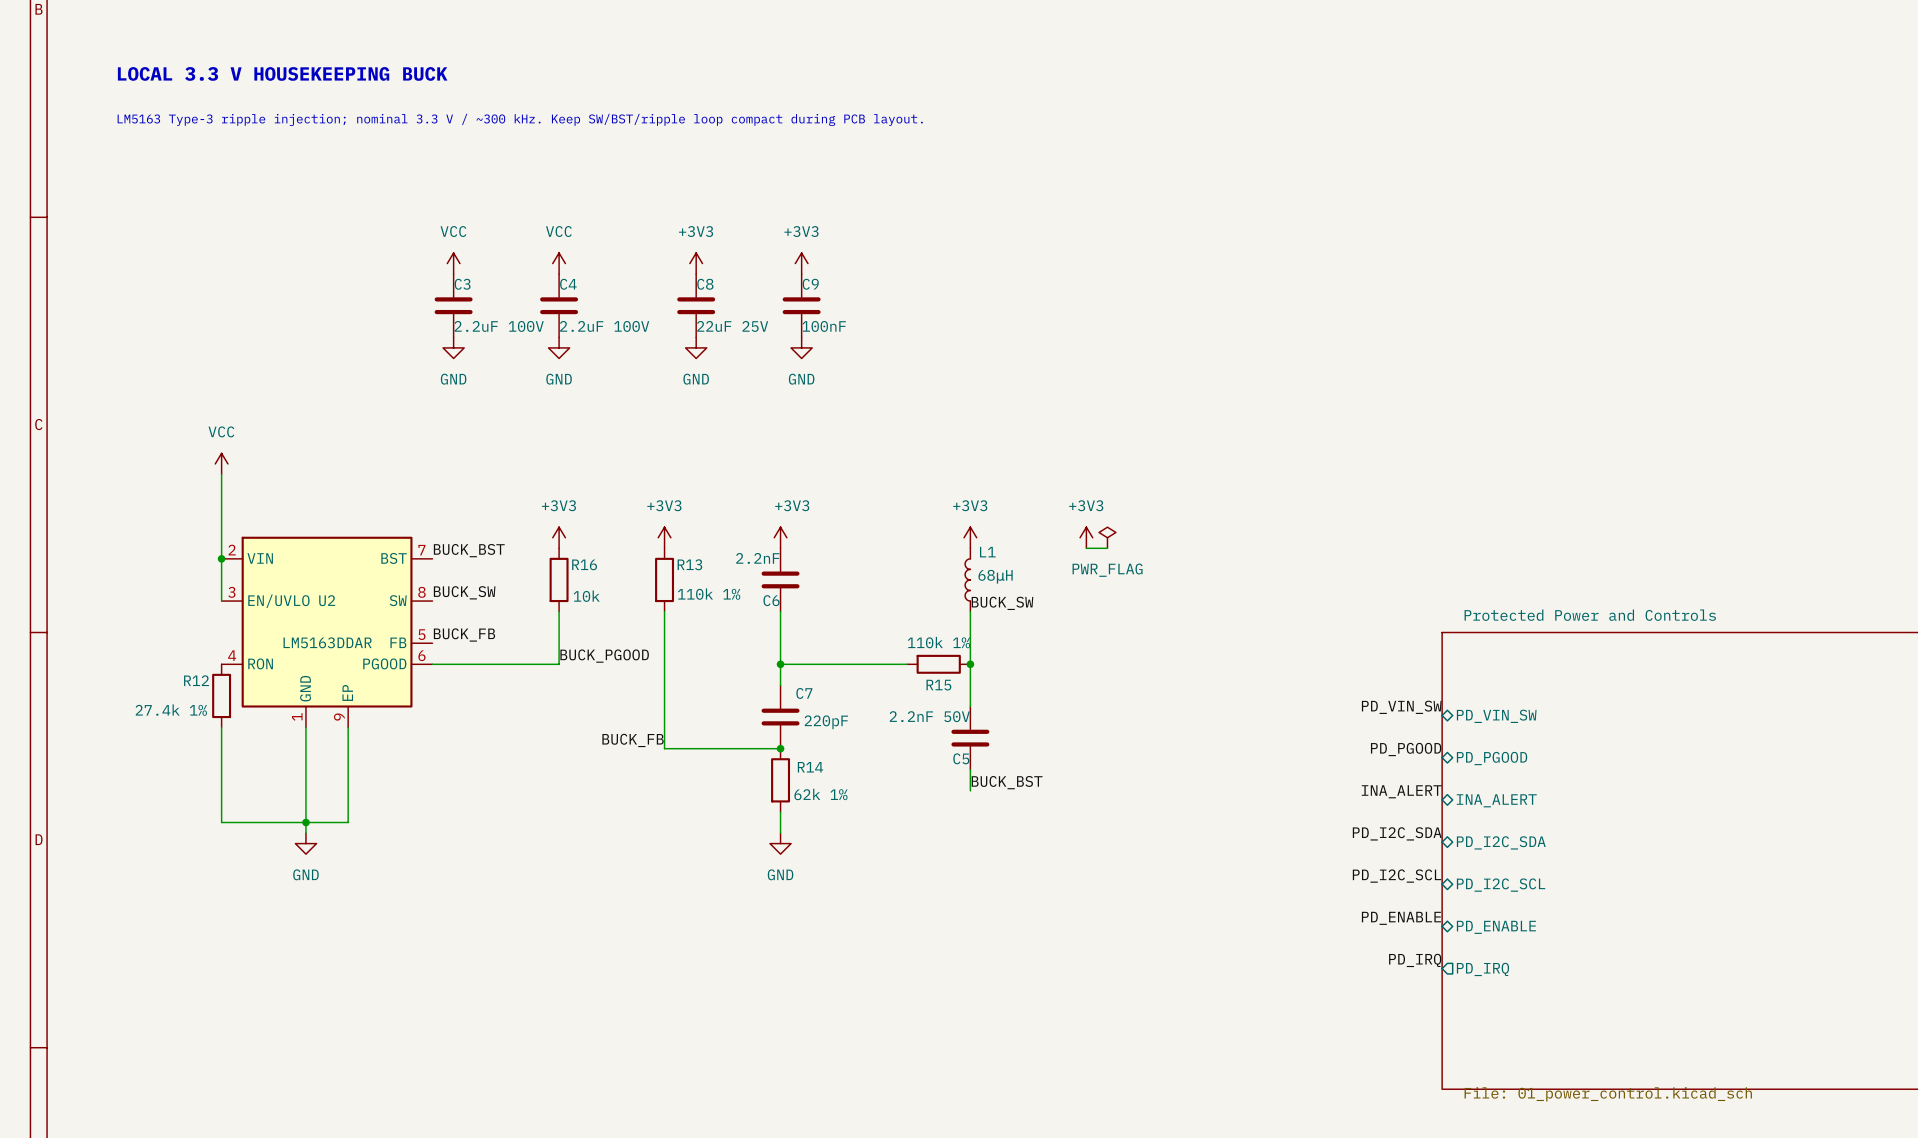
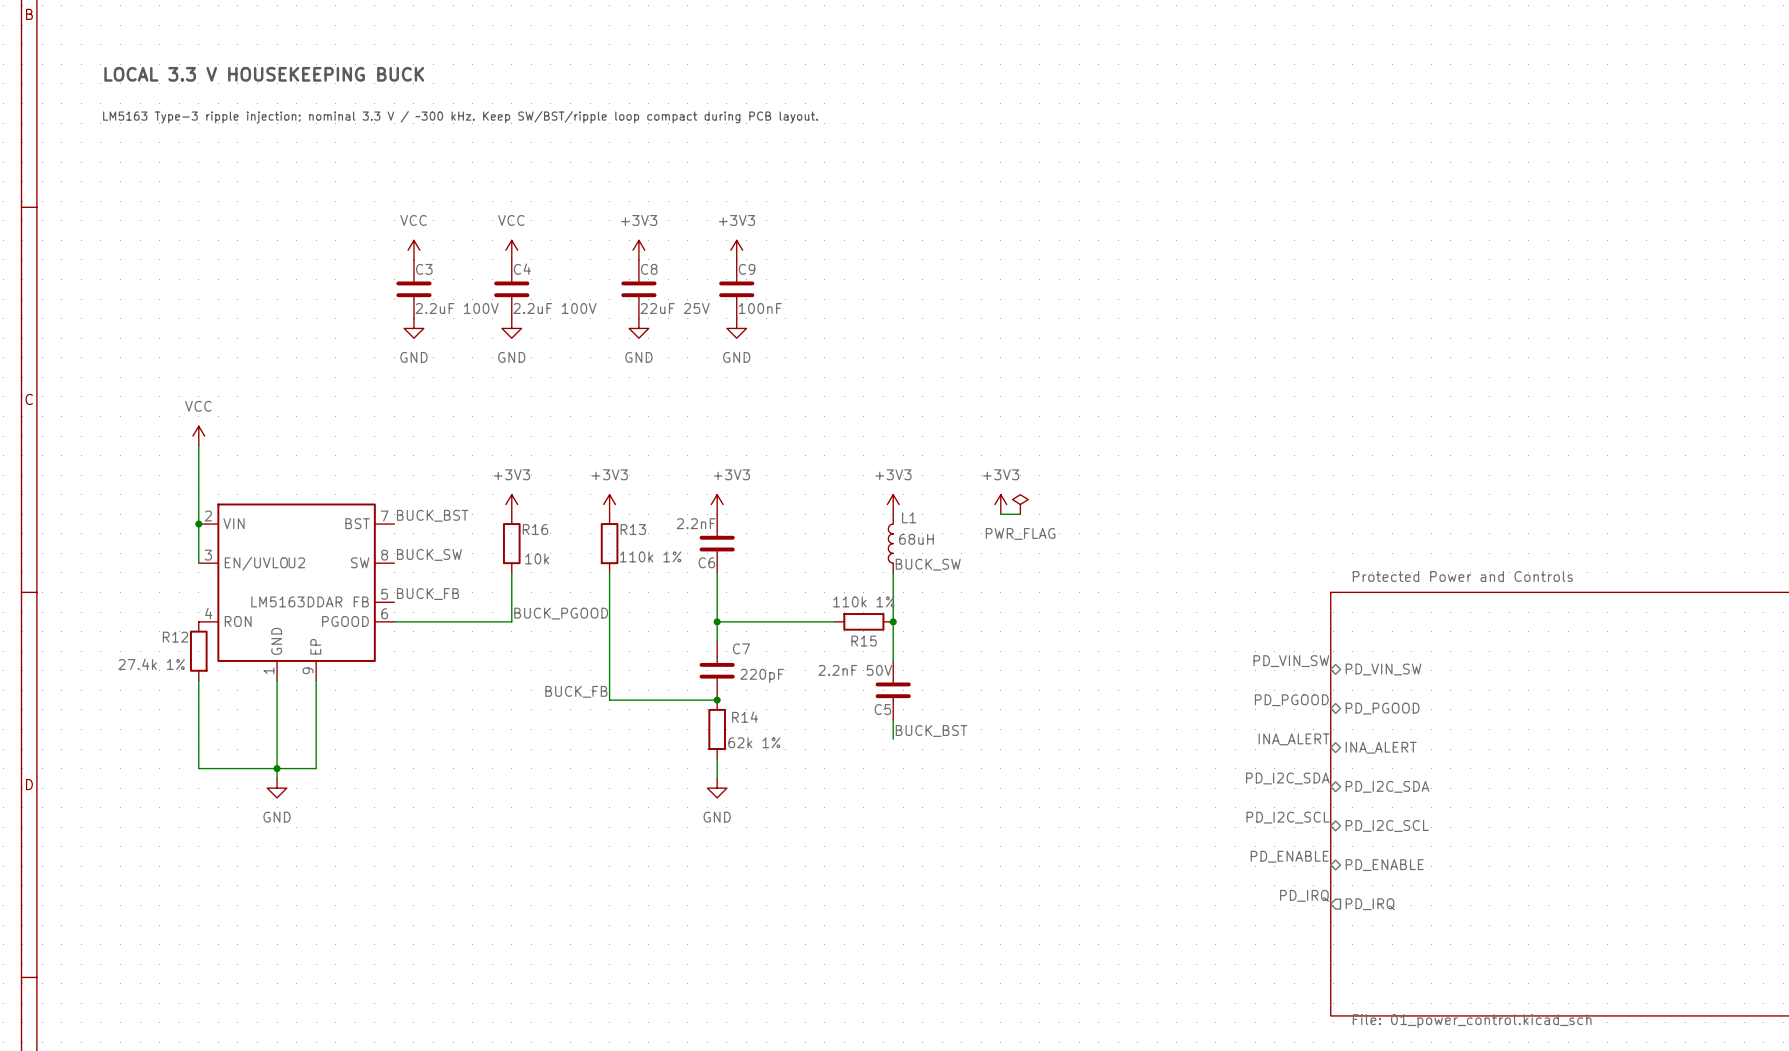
L1 value: 68μH (995, 576) -> 68uH (916, 539)

